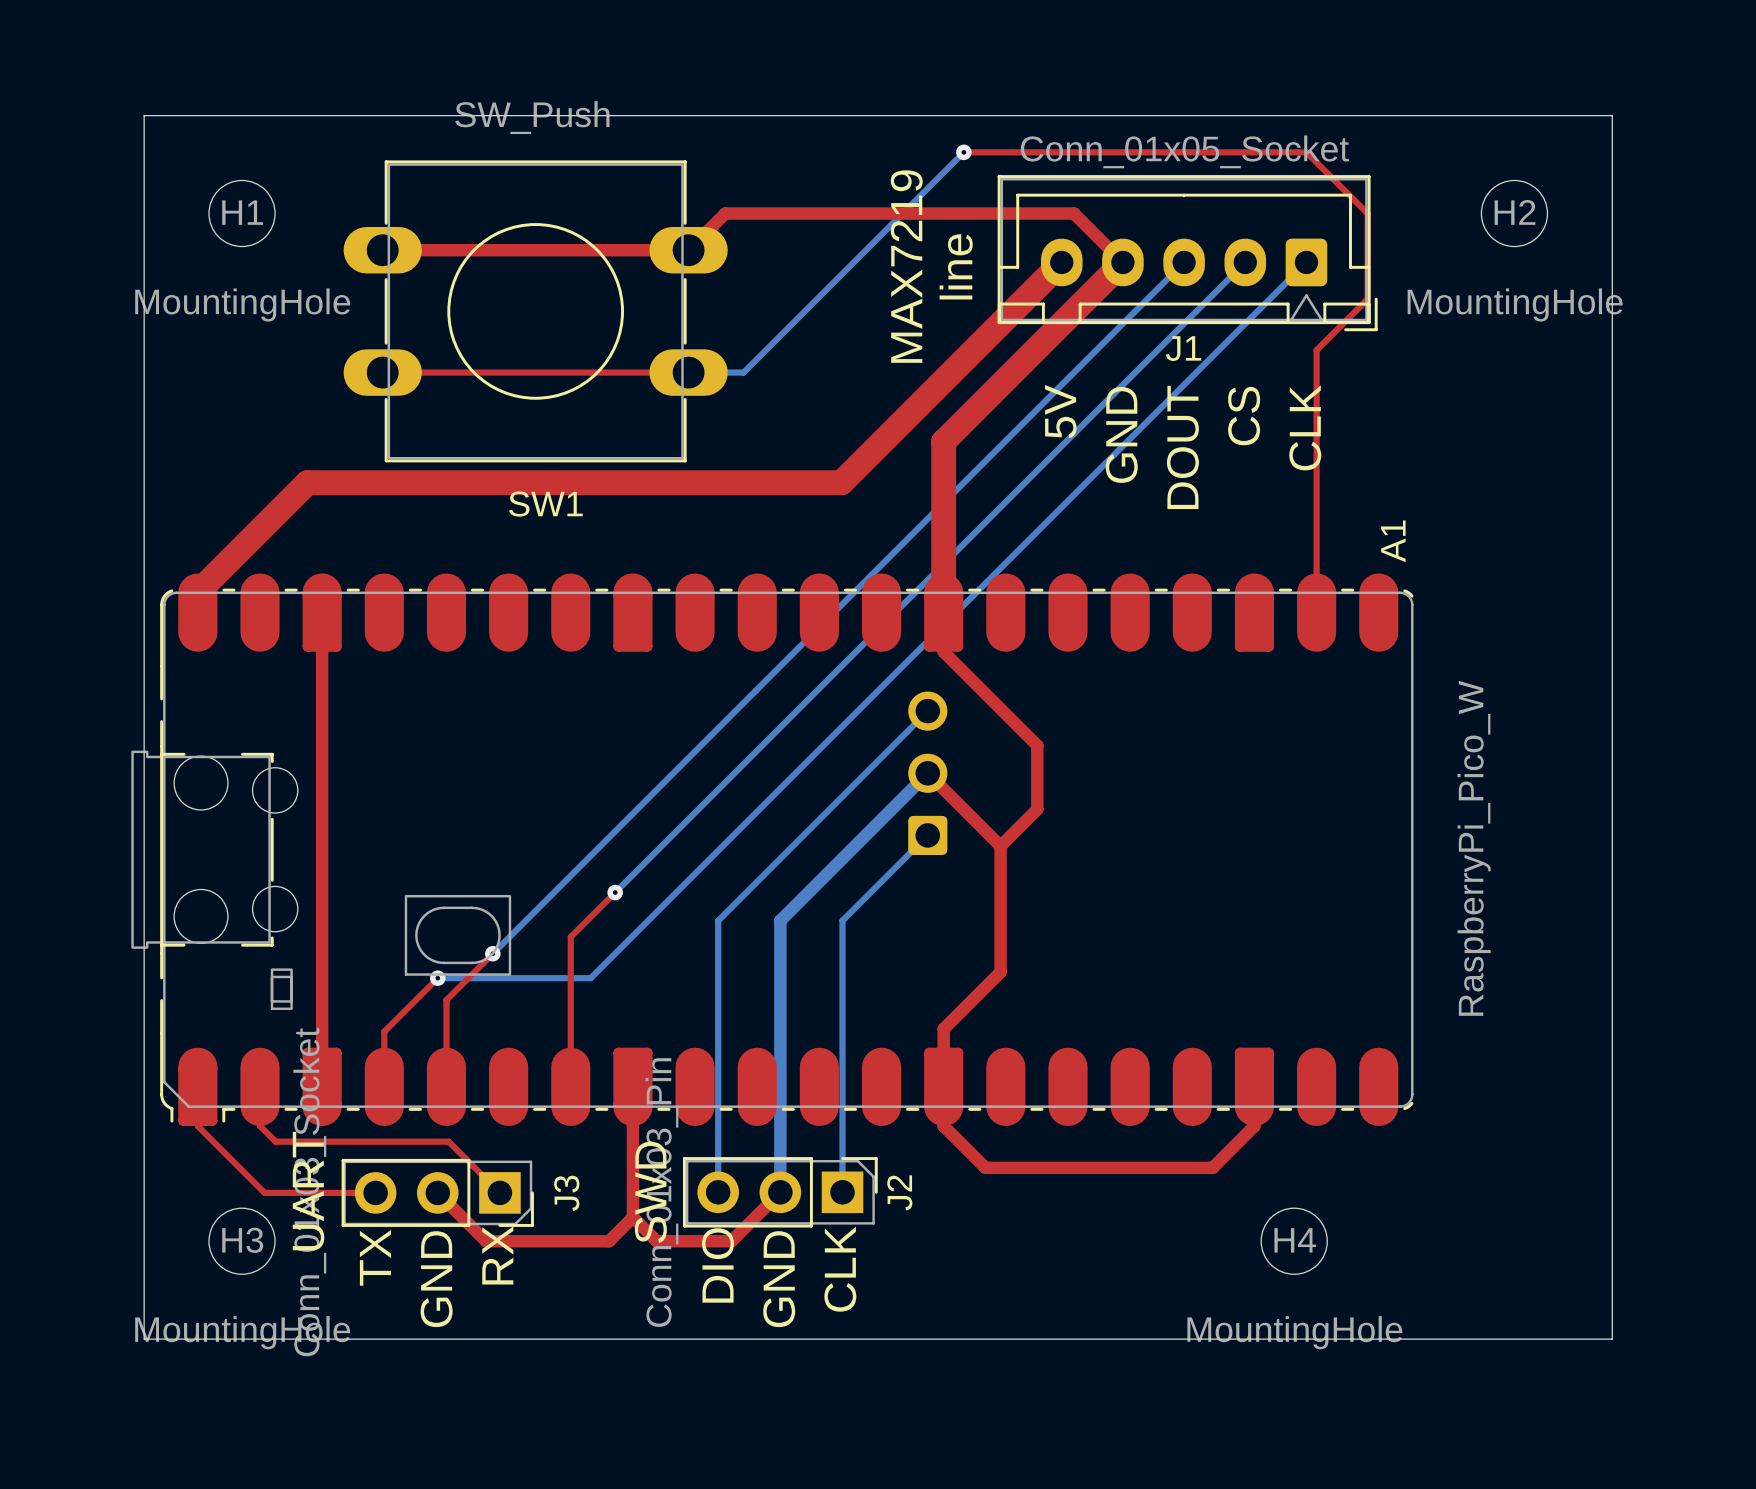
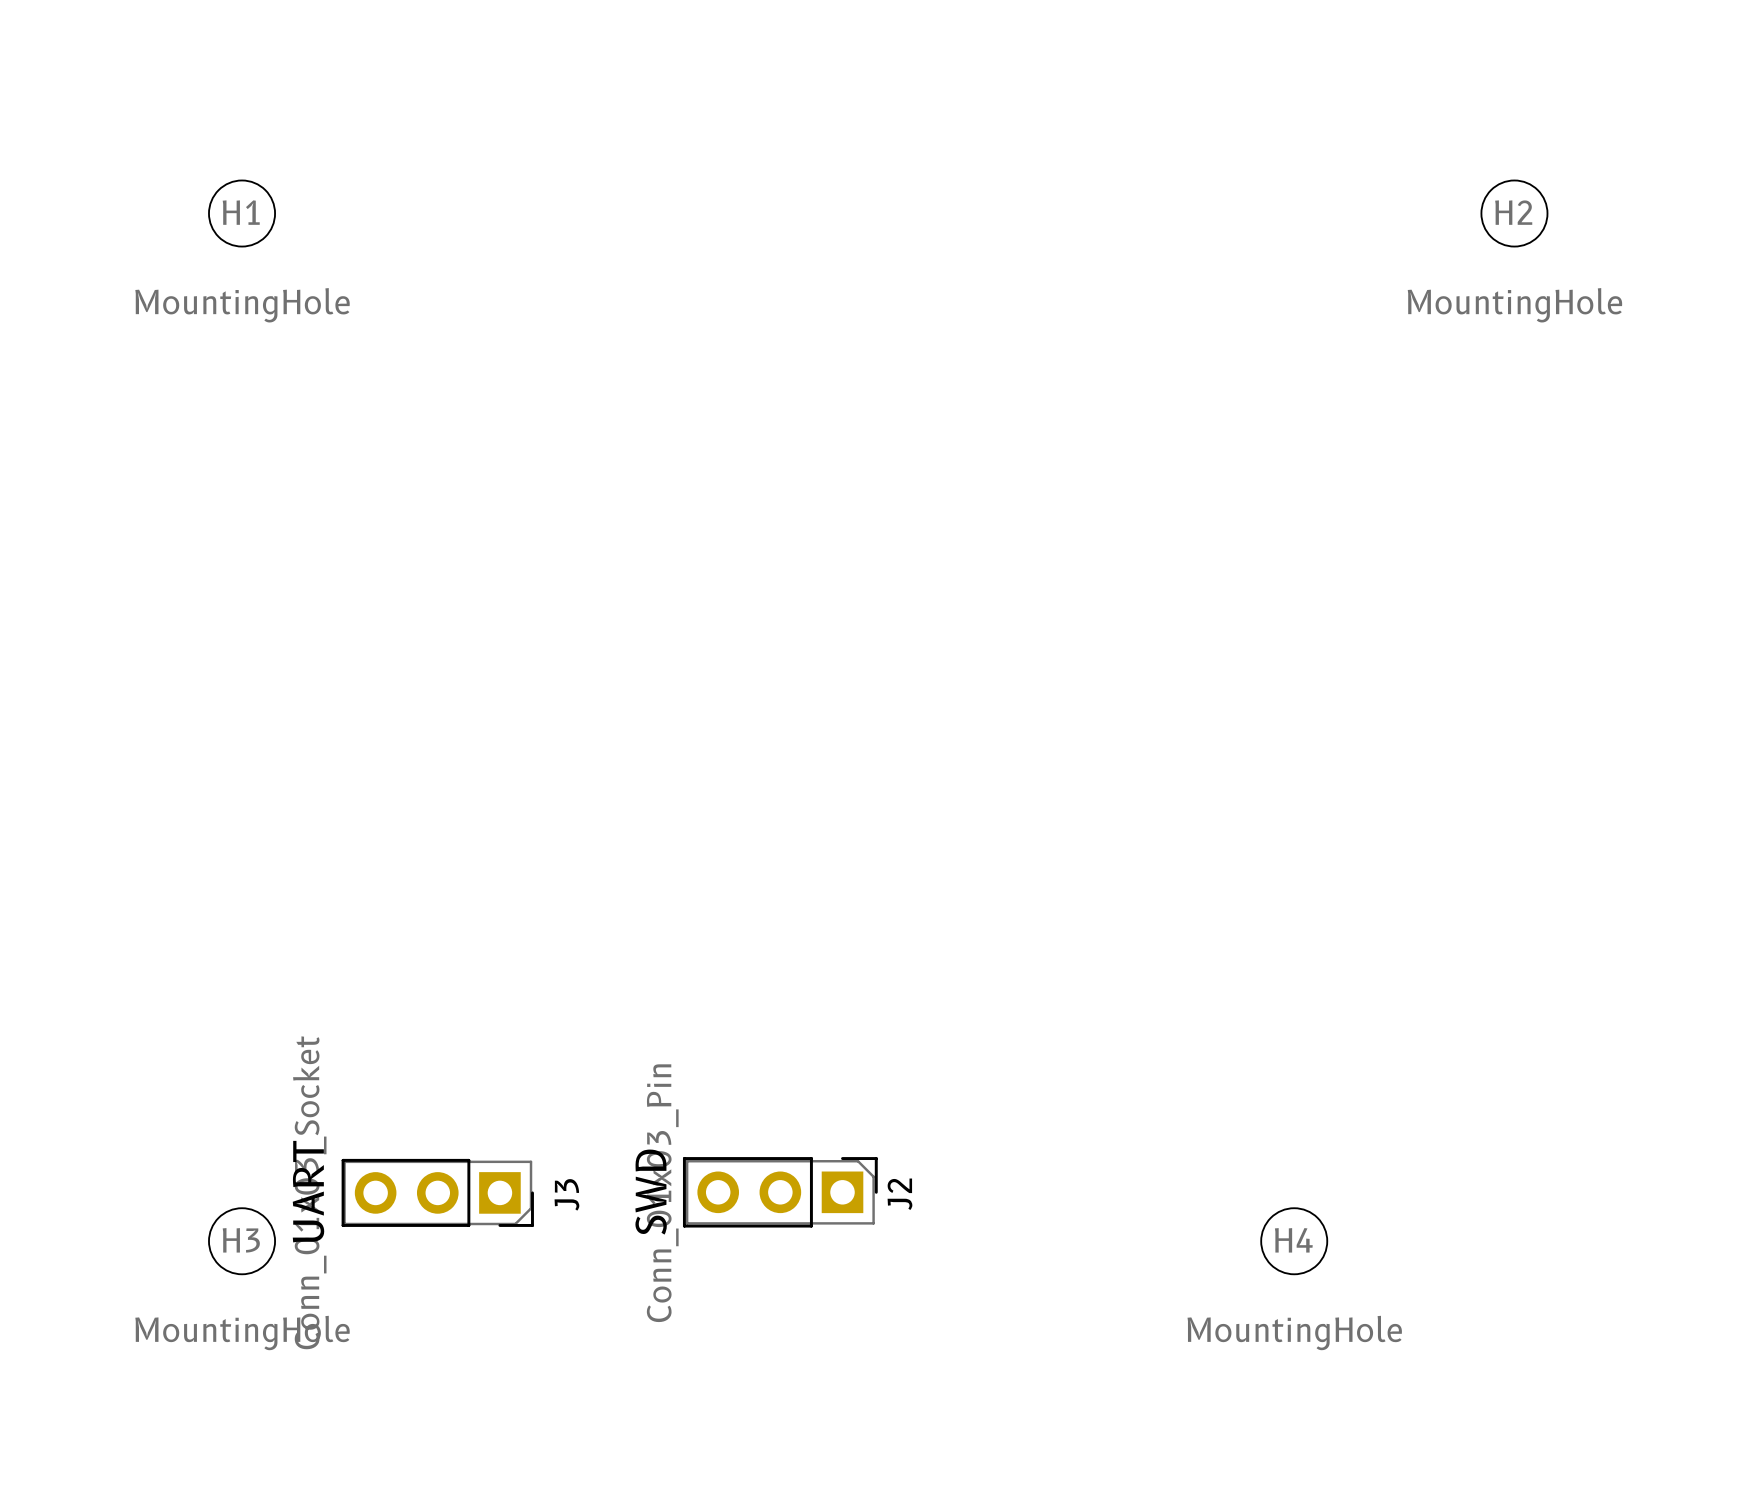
board edge: (144, 115) (1612, 115) (1612, 1339) (144, 1339) (144, 115) -> none
top track: (963, 152) (1306, 152) (1367, 213) (1367, 299) (1316, 350) (1316, 612) -> none
bottom track: (963, 152) (743, 372) (688, 372) -> none
via: (963, 152) -> none
top track: (382, 250) (688, 250) (725, 213) (1073, 213) (1122, 262) (943, 441) (943, 651) (1037, 745) (1037, 809) (1000, 846) -> none
J1: Conn_01x05_Socket (1187, 253) -> none
top track: (1061, 262) (841, 482) (307, 482) (197, 592) (197, 612) -> none
bottom track: (1184, 262) (492, 953) -> none
bottom track: (1245, 262) (615, 892) -> none
bottom track: (1306, 262) (590, 978) (437, 978) -> none
text: MAX7219 (906, 266) -> none
text: line (956, 266) -> none
SW1: SW_Push (535, 311) -> none
top track: (382, 372) (688, 372) -> none
text: 5V (1060, 411) -> none
text: CS (1244, 416) -> none
text: CLK (1305, 427) -> none
text: GND (1121, 434) -> none
text: DOUT (1182, 447) -> none
top track: (322, 612) (322, 1086) -> none
bottom track: (927, 711) (718, 920) (718, 1192) -> none
top track: (927, 773) (1000, 846) -> none
bottom track: (927, 773) (780, 920) (780, 1192) -> none
bottom track: (927, 835) (842, 920) (842, 1192) -> none
top track: (1000, 846) (1000, 972) (943, 1028) (943, 1126) (985, 1167) (1212, 1167) (1254, 1126) (1254, 1086) -> none
A1: RaspberryPi_Pico_W (772, 849) -> none
top track: (615, 892) (570, 936) (570, 1086) -> none
via: (615, 892) -> none
top track: (492, 953) (446, 1000) (446, 1086) -> none
via: (492, 953) -> none
top track: (437, 978) (384, 1031) (384, 1086) -> none
via: (437, 978) -> none
top track: (197, 1086) (197, 1126) (264, 1192) (375, 1192) -> none
top track: (260, 1086) (260, 1125) (275, 1141) (448, 1141) (499, 1192) -> none
top track: (632, 1086) (632, 1217) -> none
top track: (437, 1192) (486, 1241) (609, 1241) (632, 1217) -> none
top track: (780, 1192) (731, 1241) (656, 1241) (632, 1217) -> none
text: RX (497, 1255) -> none
text: TX (375, 1257) -> none
text: DIO (718, 1265) -> none
text: CLK (840, 1269) -> none
text: GND (436, 1279) -> none
text: GND (779, 1279) -> none

